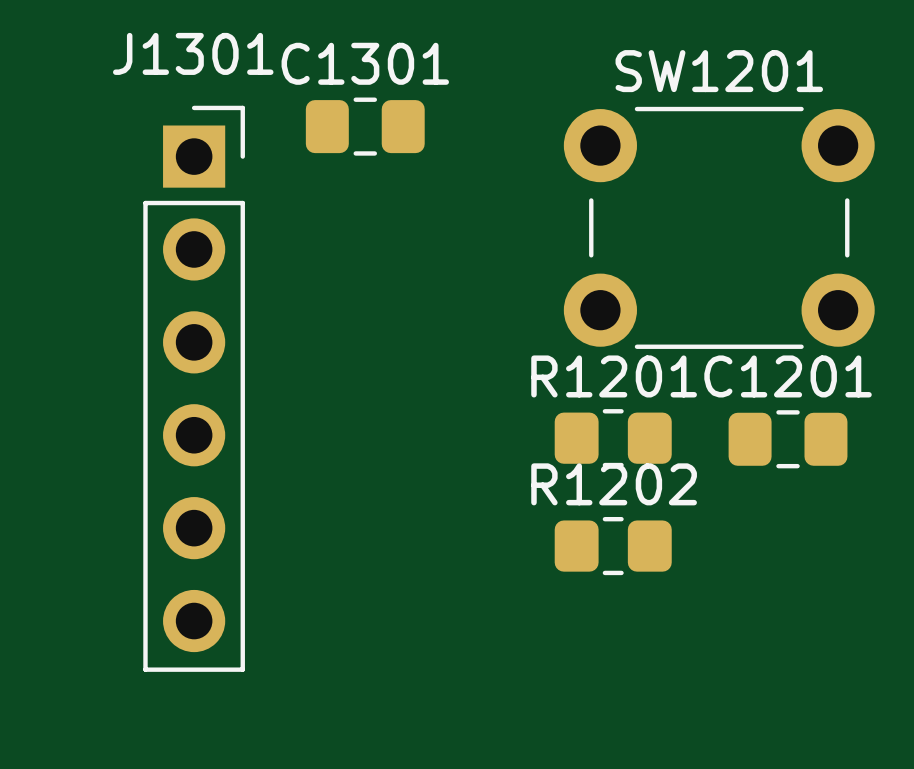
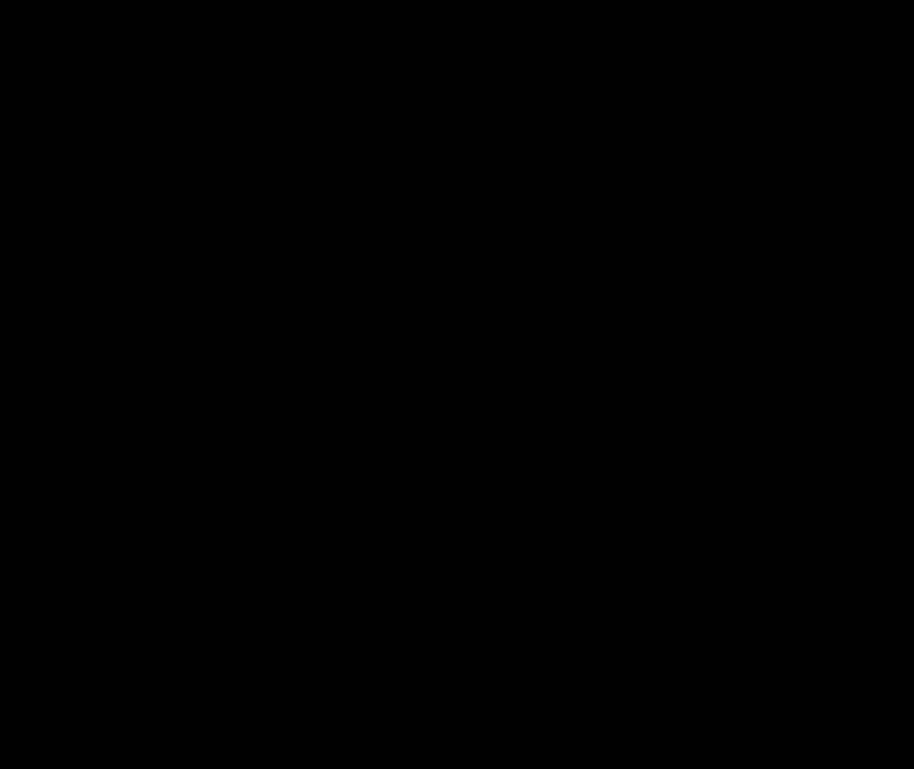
C1301: (365, 126) -> none
SW1201: (719, 227) -> none
J1301: (194, 388) -> none
R1201: (613, 438) -> none
C1201: (788, 439) -> none
R1202: (613, 546) -> none

